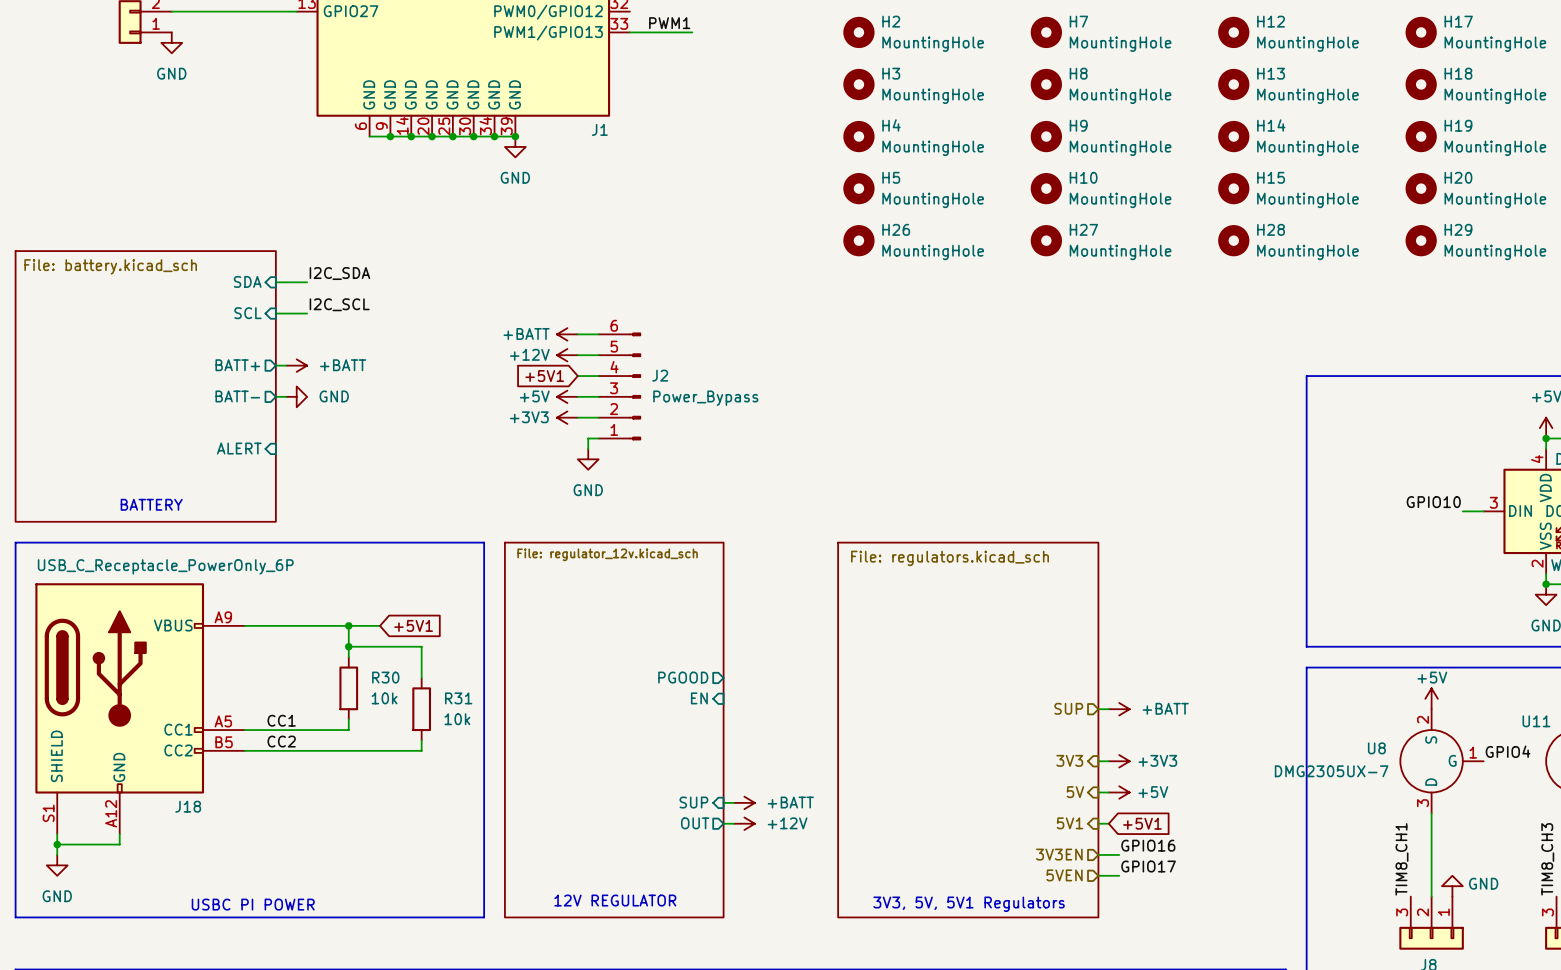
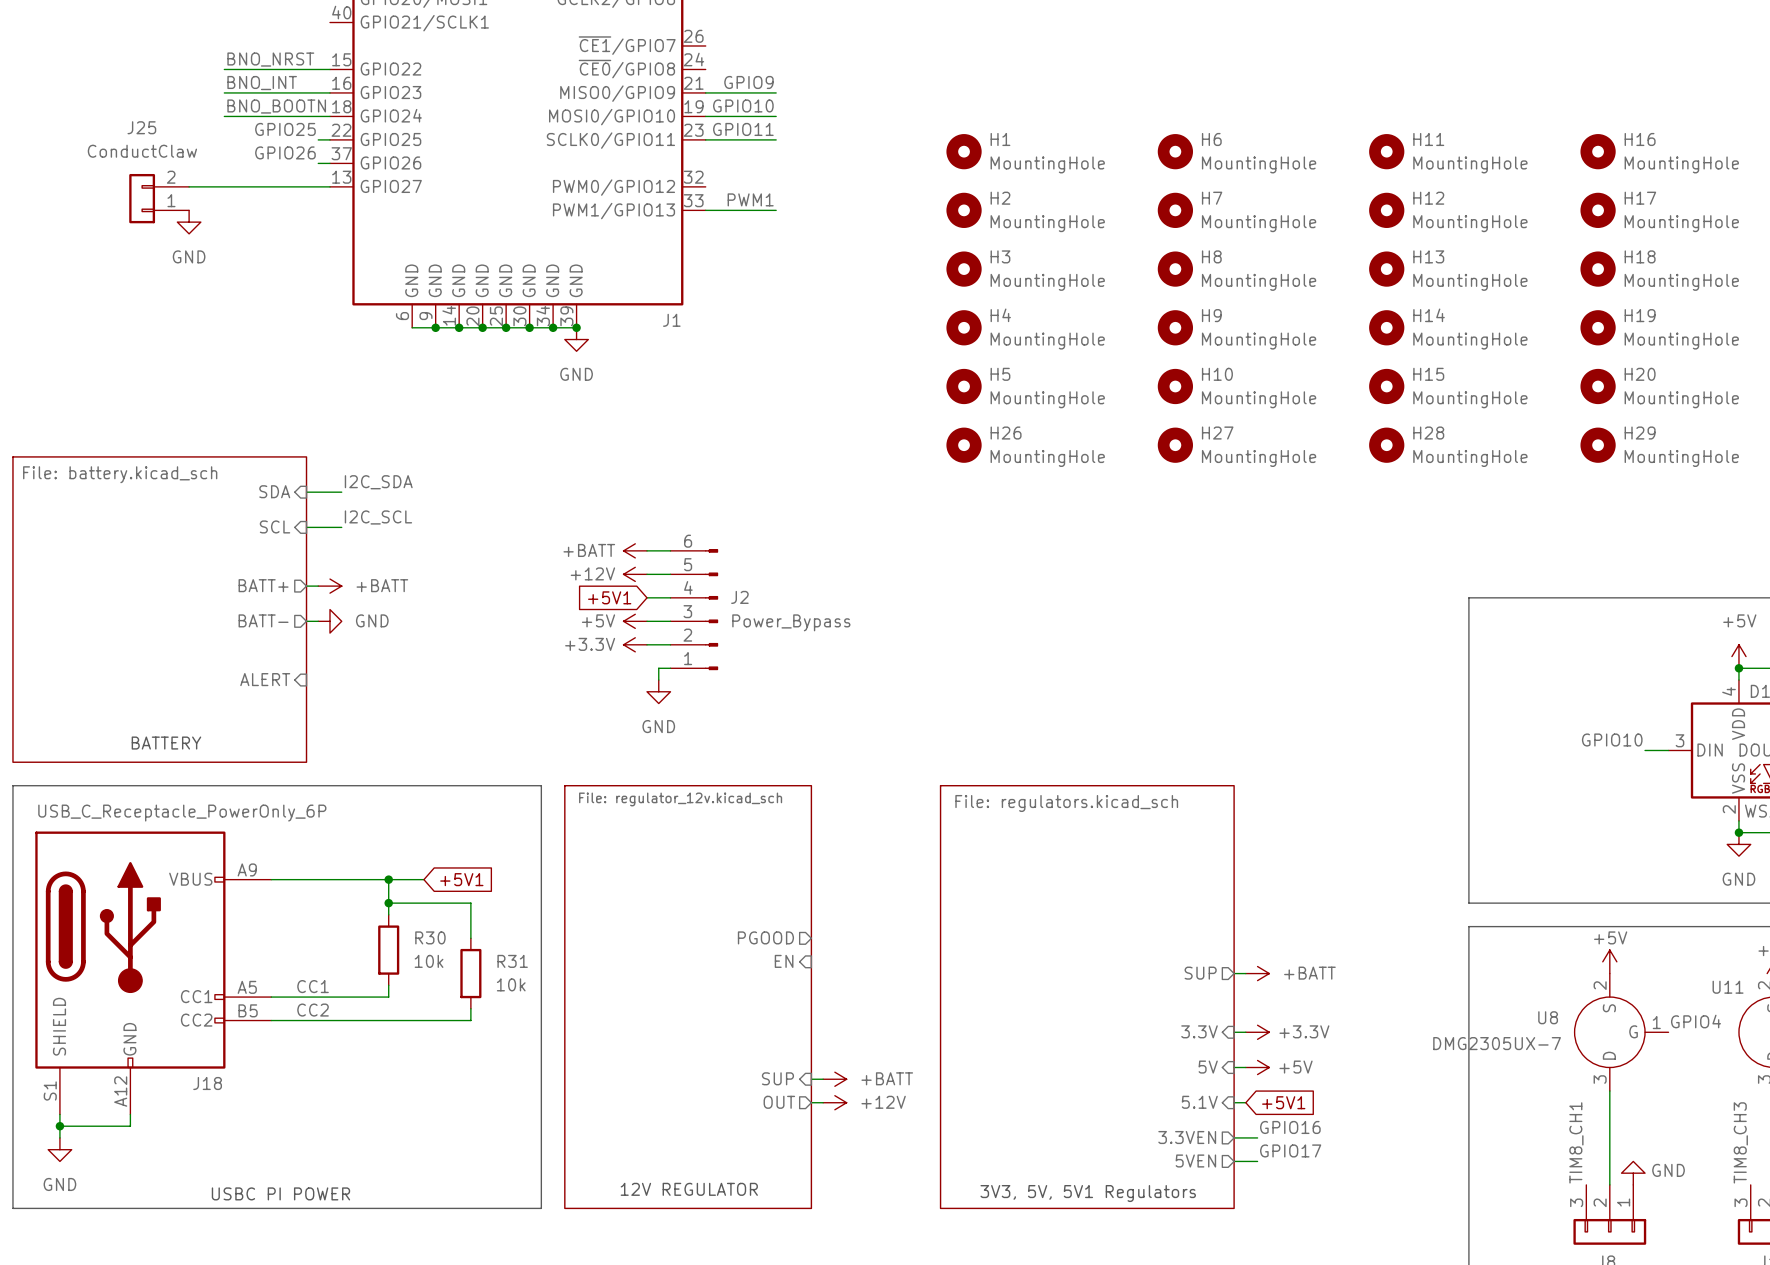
power symbol: +3V3 (567, 417) -> +3.3V (635, 644)
hierarchical label: 3V3 (1069, 760) -> 3.3V (1199, 1031)
power symbol: +3V3 (1119, 761) -> +3.3V (1257, 1032)
hierarchical label: 5V1 (1069, 823) -> 5.1V (1199, 1102)
hierarchical label: 3V3EN (1059, 854) -> 3.3VEN (1187, 1137)

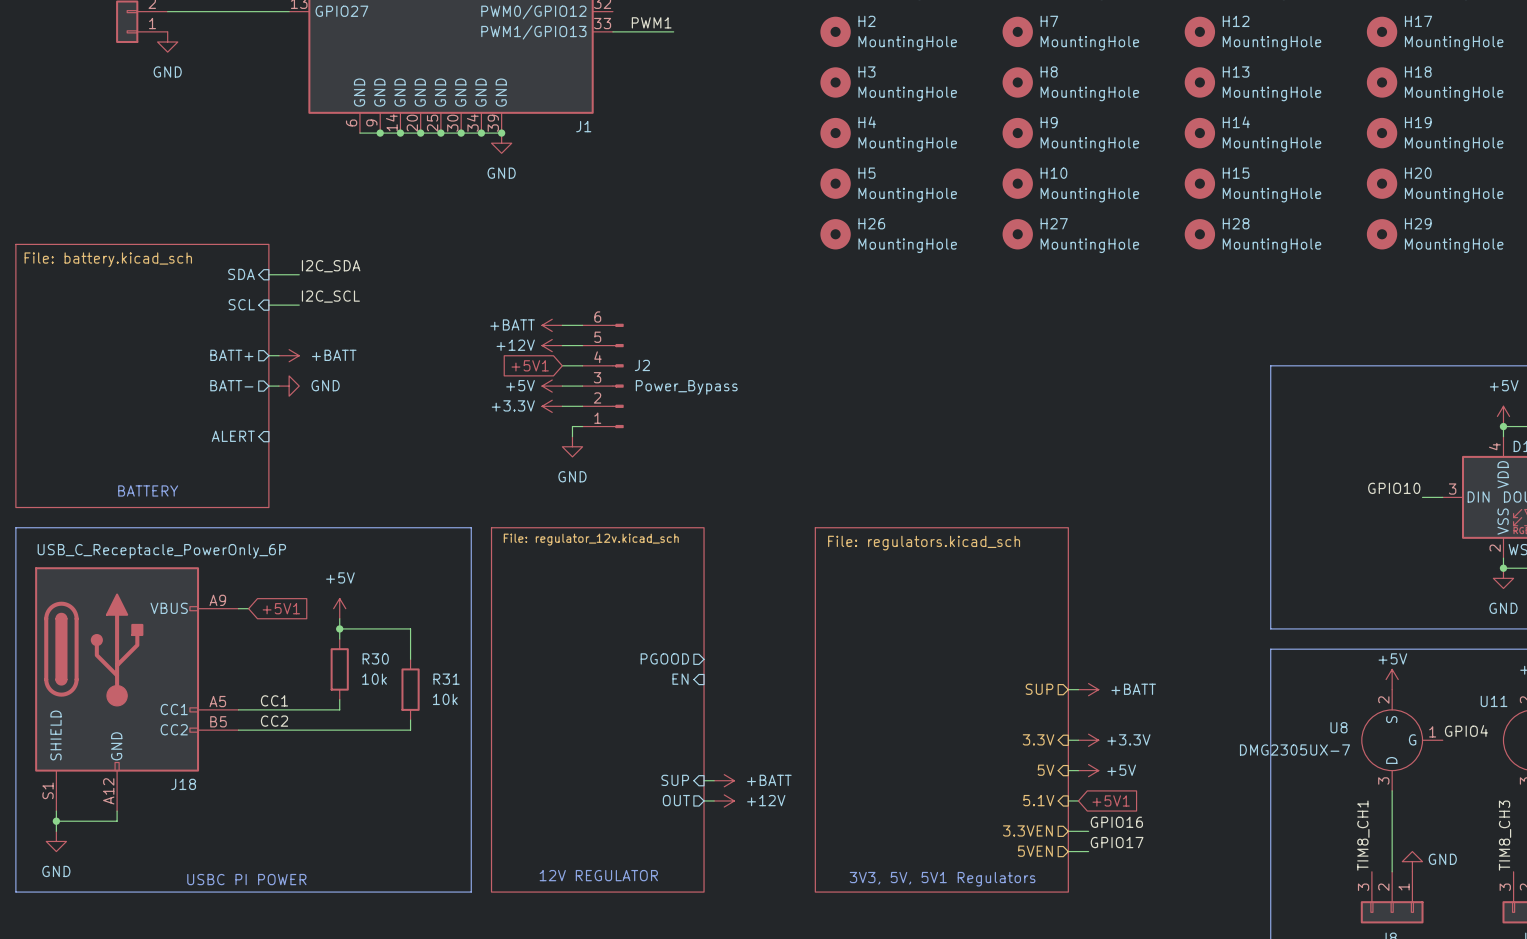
wire: (283, 879) (423, 879) -> none
junction: (388, 879) -> none
power symbol: none -> +5V (339, 608)
global label position: +5V1 (461, 879) -> +5V1 (281, 608)

